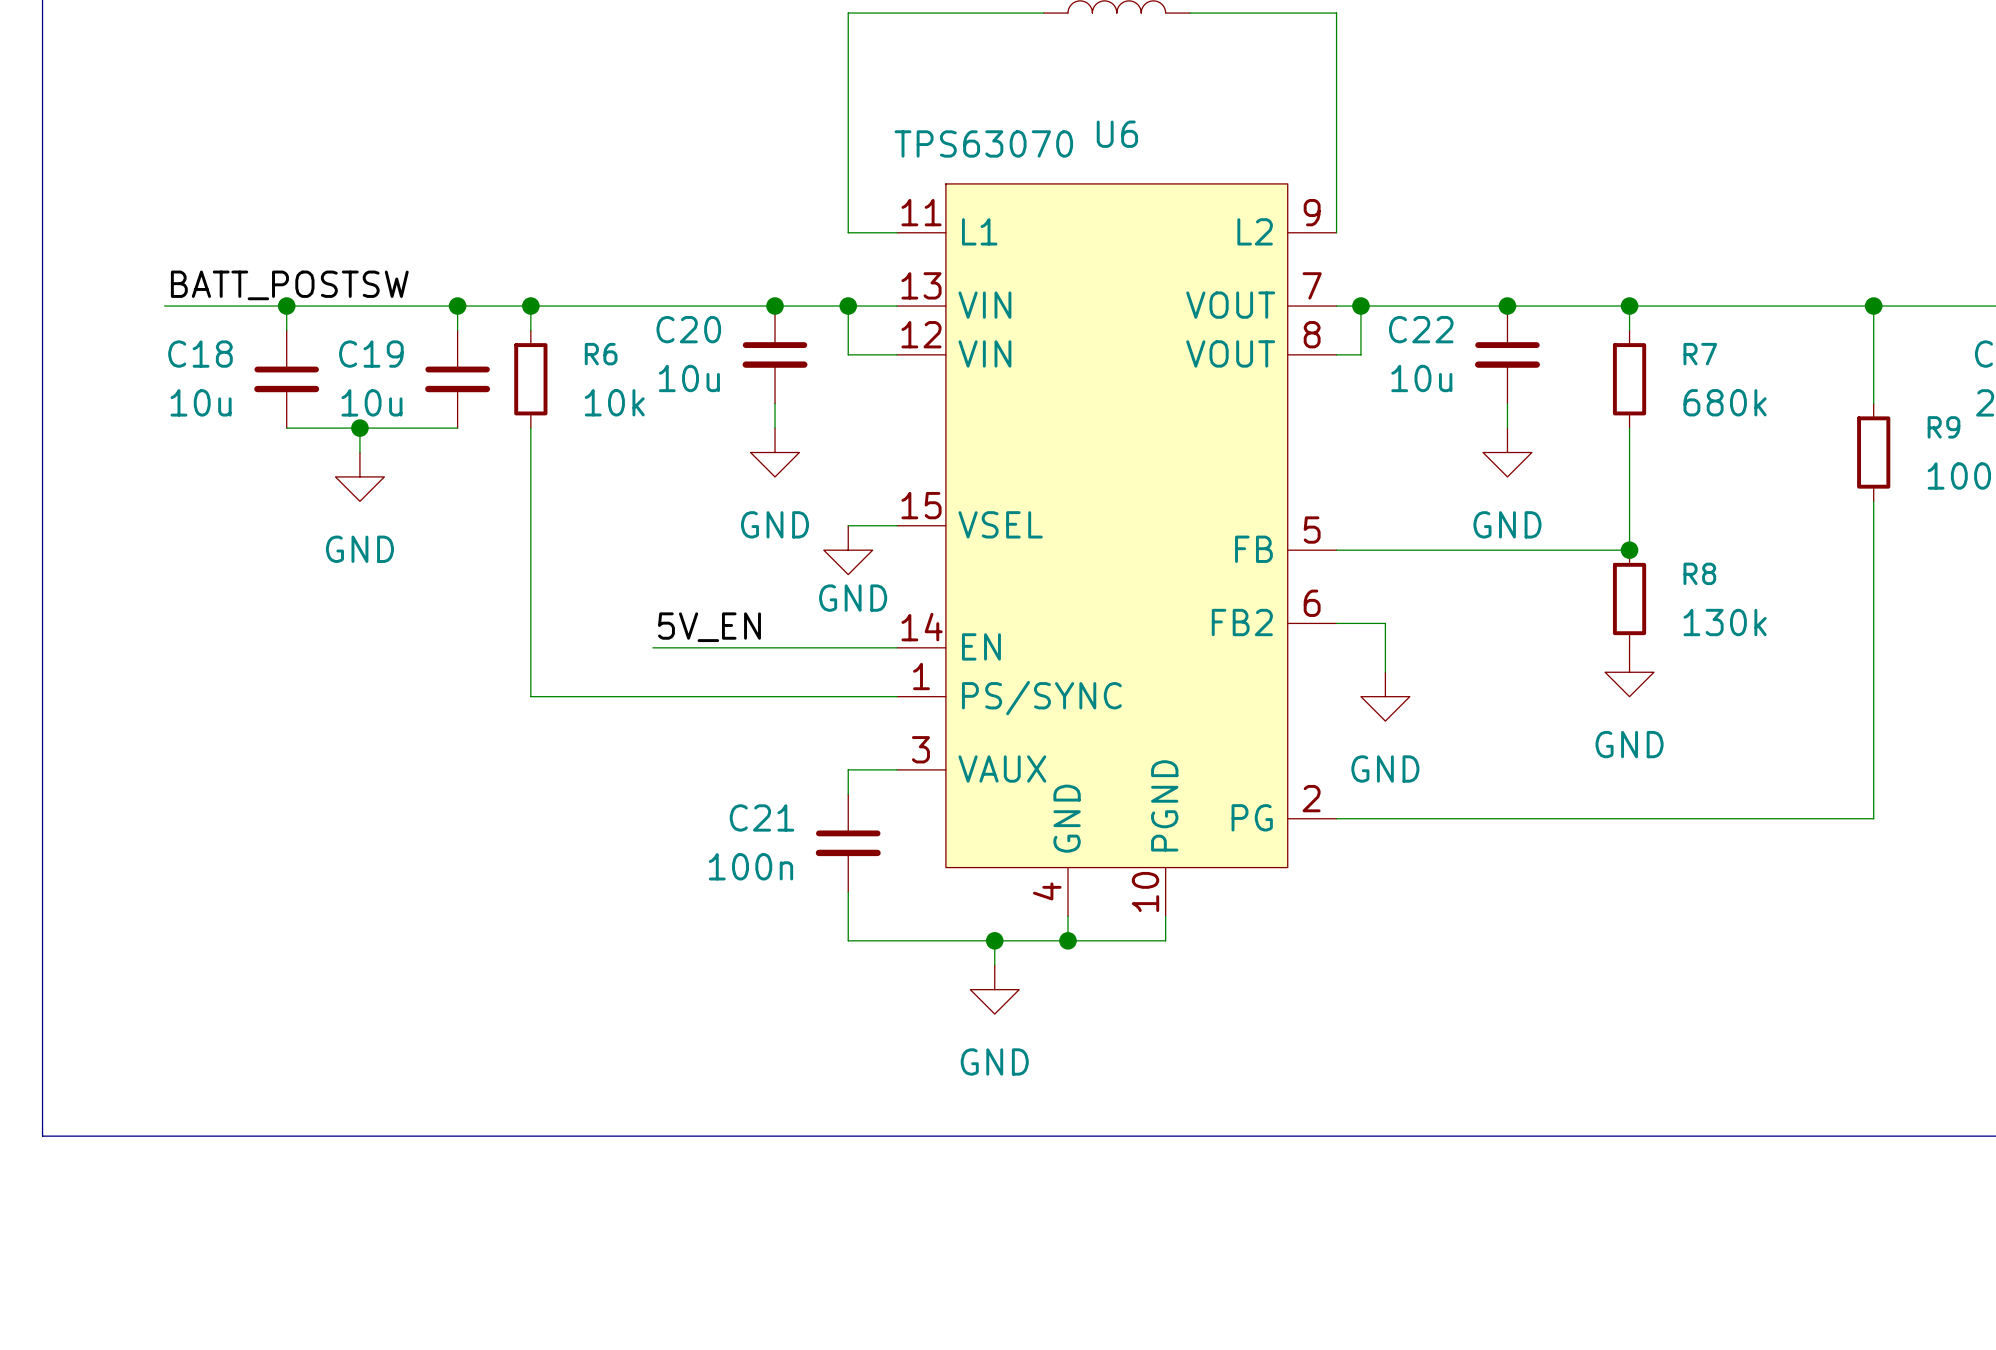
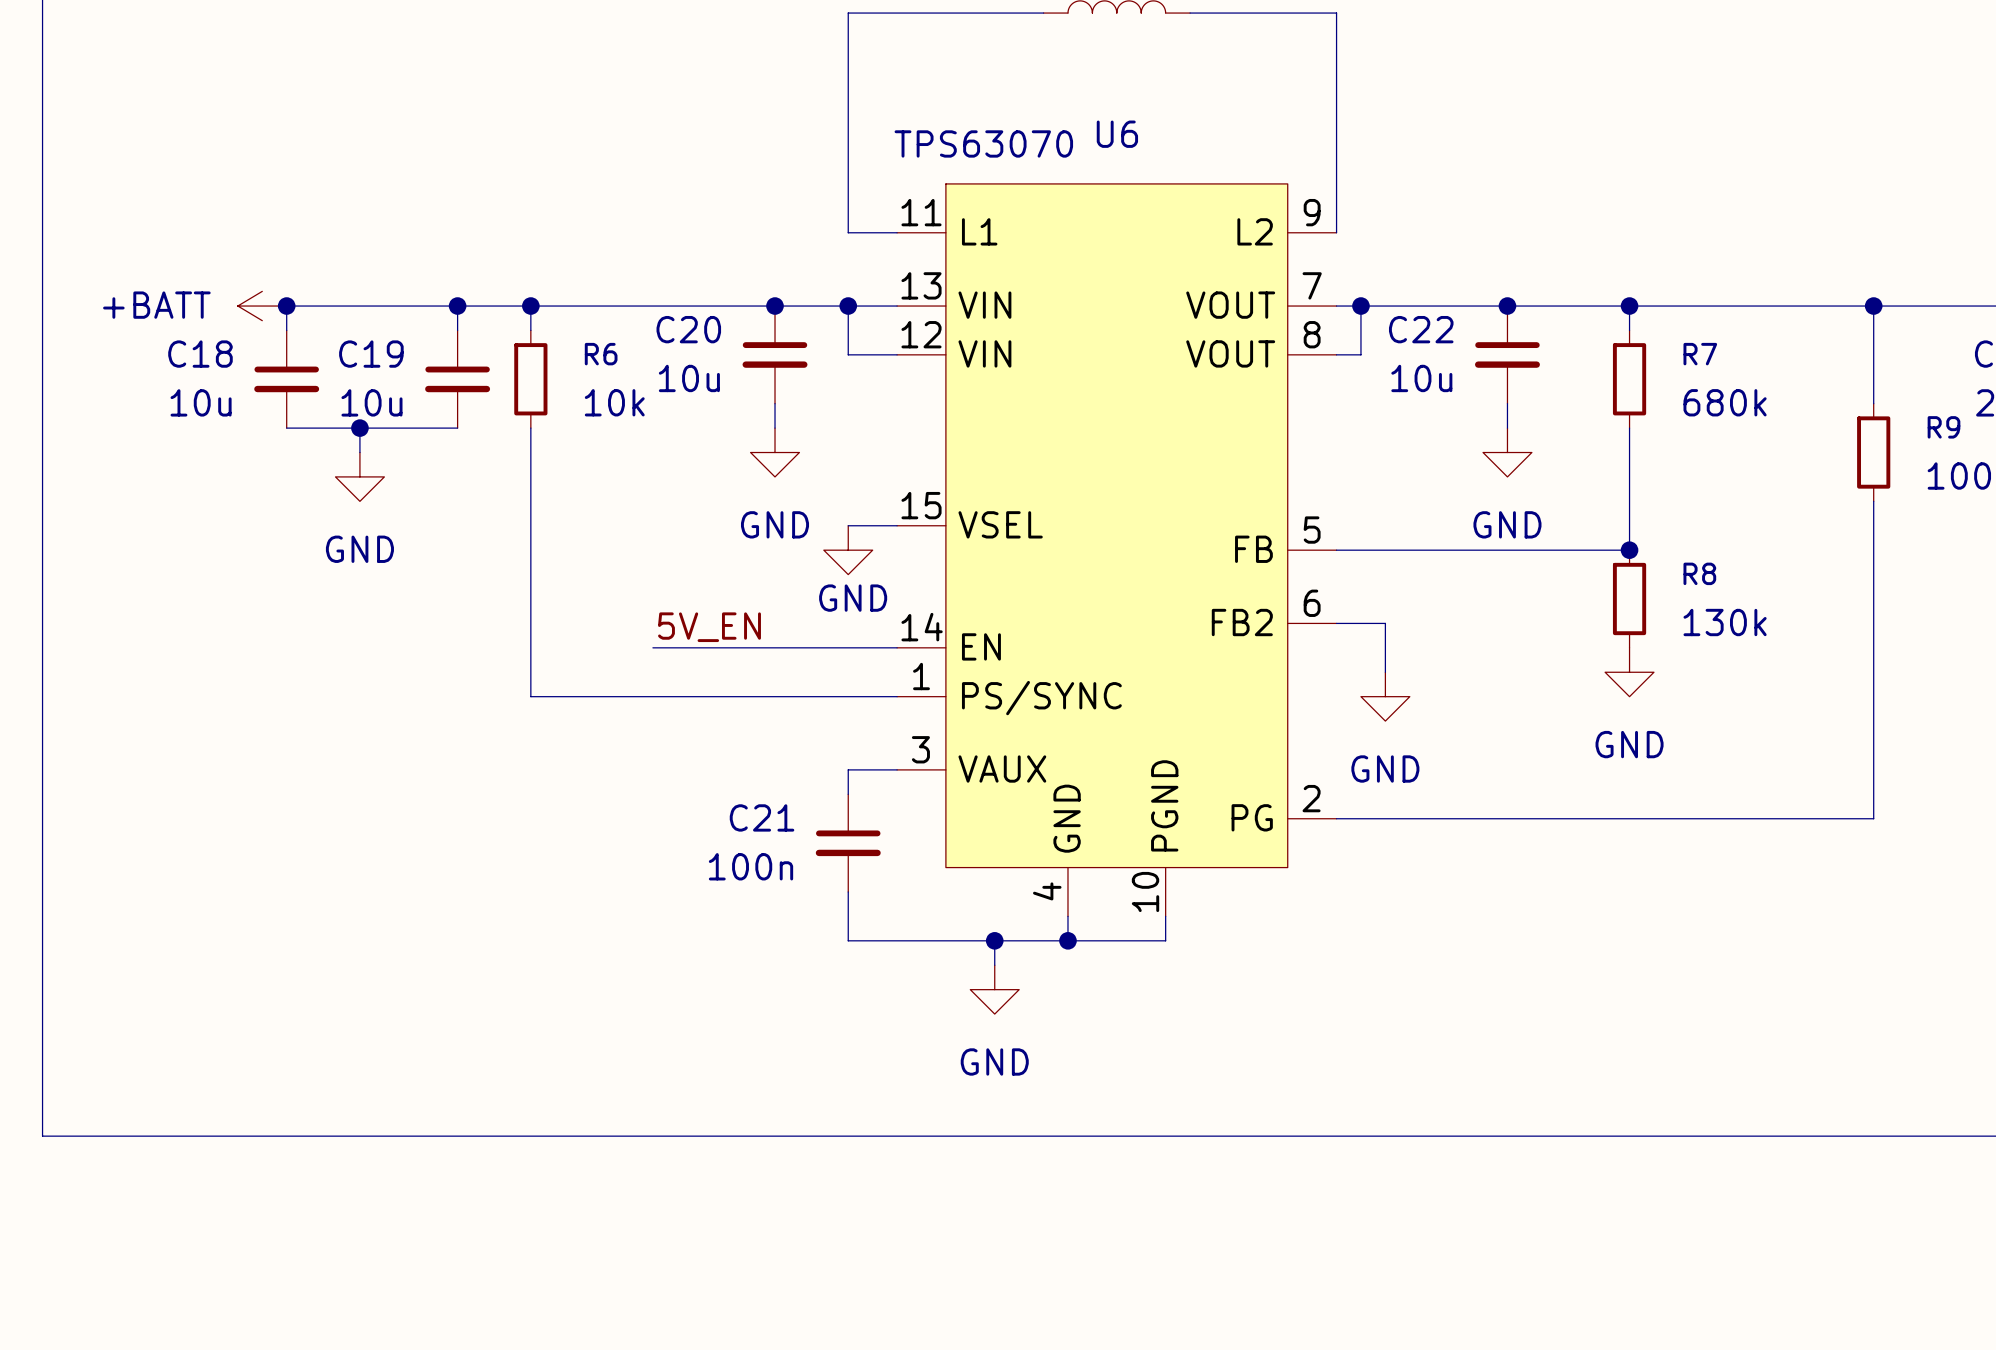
label: BATT_POSTSW (289, 285) -> none
wire: (164, 306) (286, 306) -> none
power symbol: none -> +BATT (262, 306)

